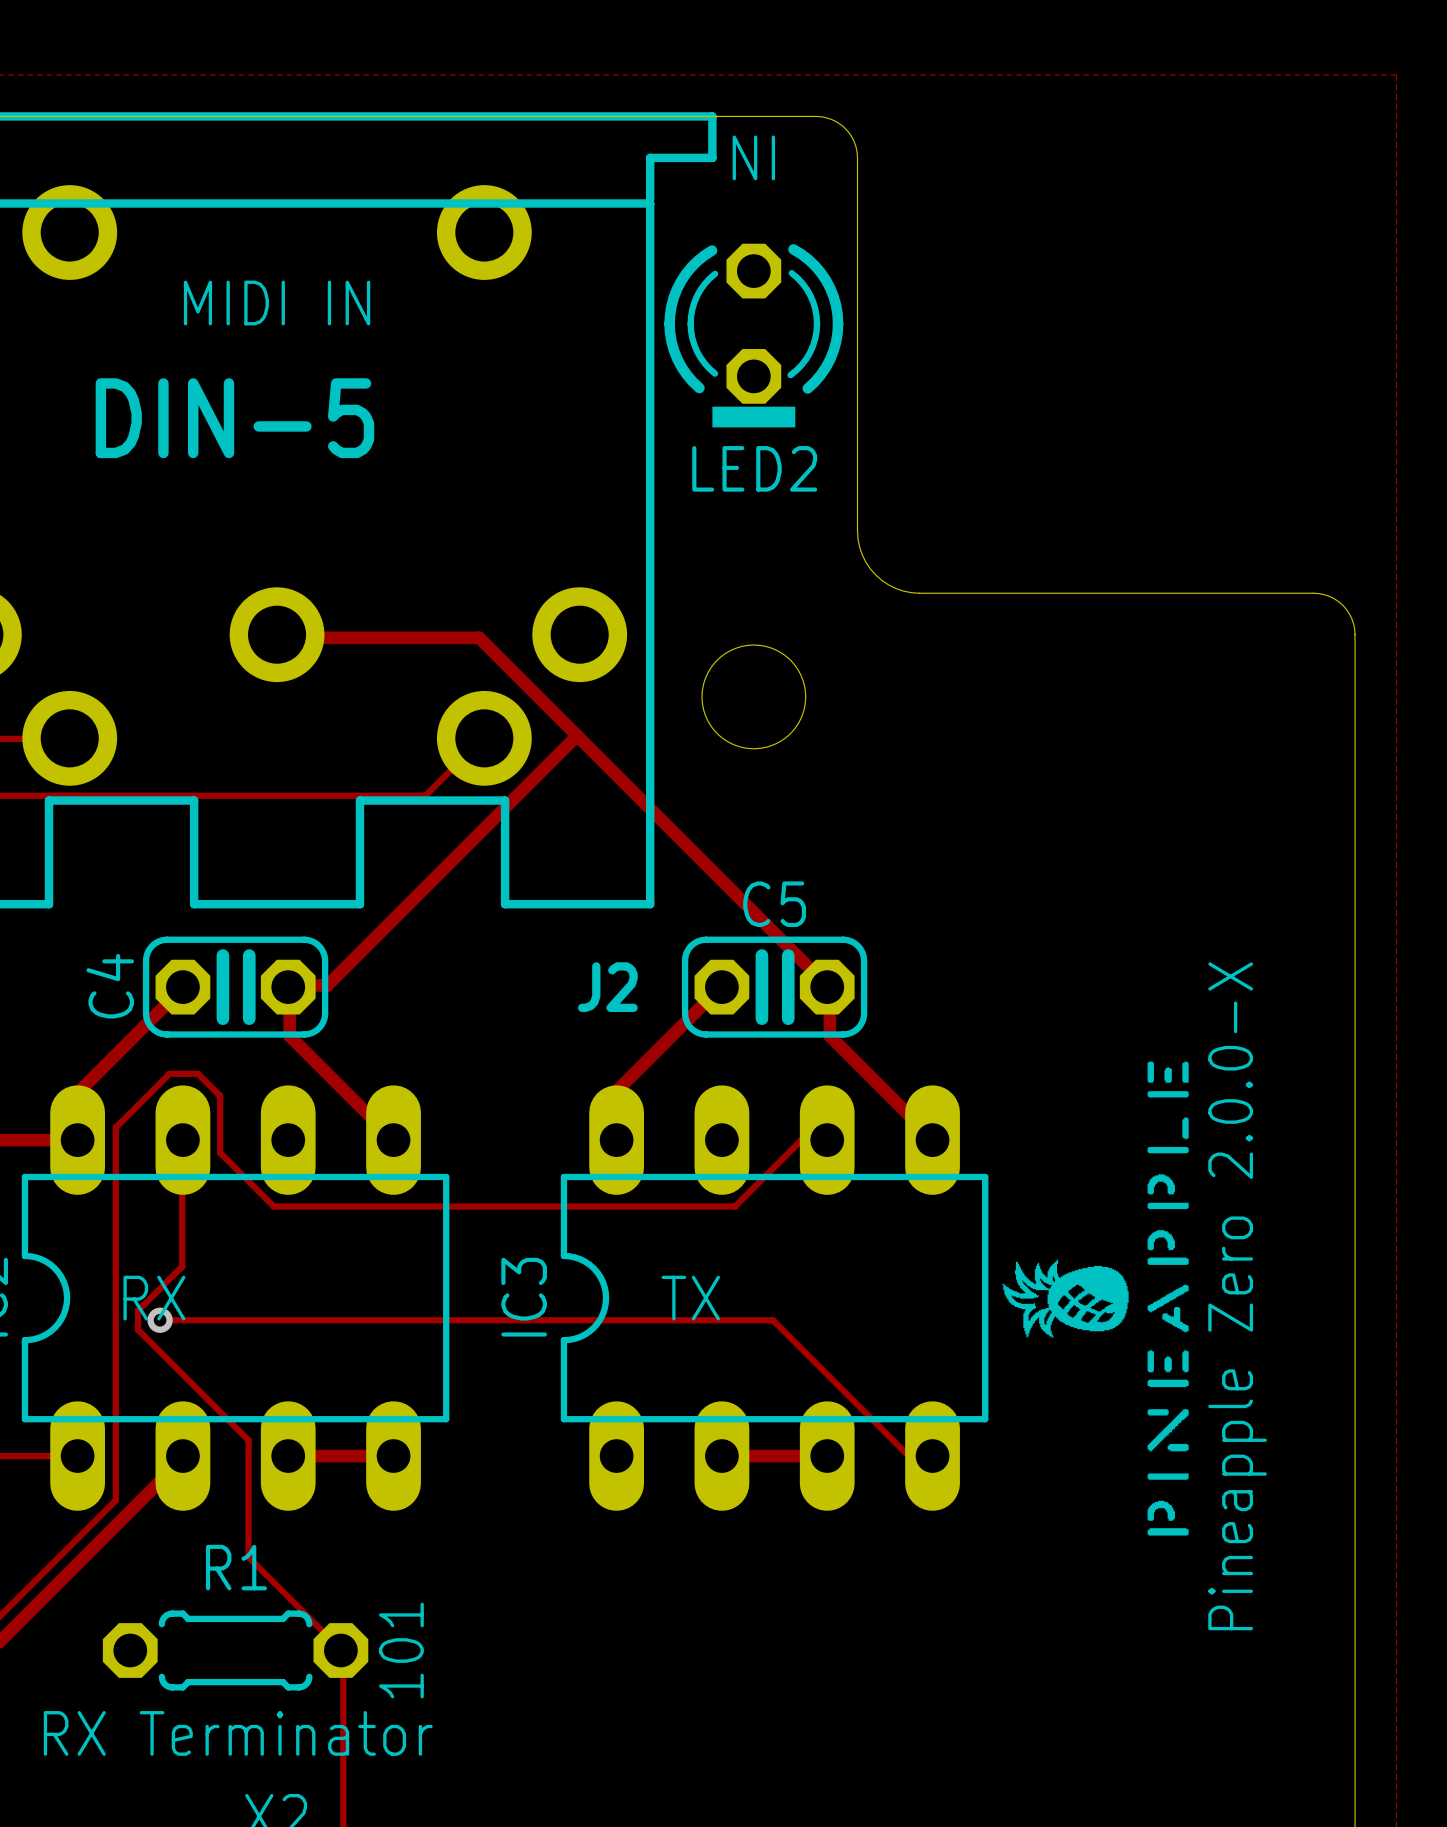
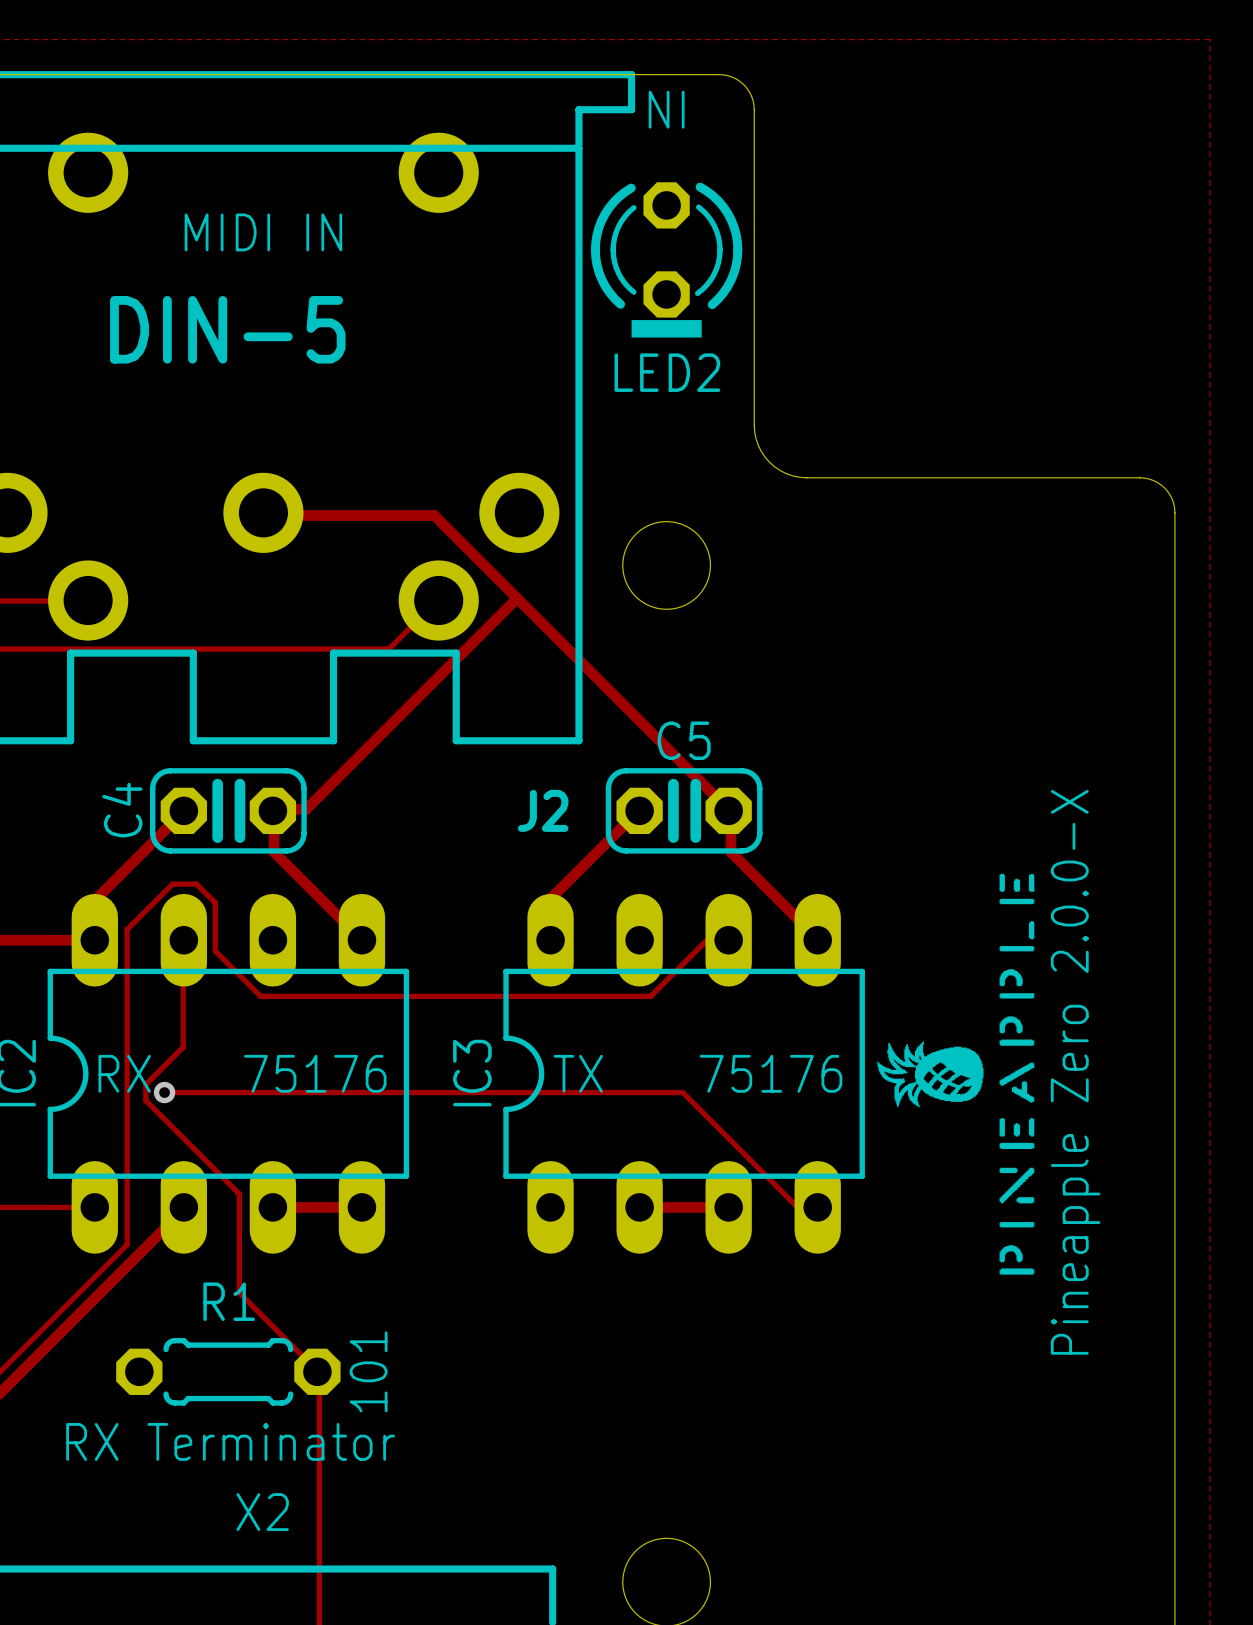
text position: RX (154, 1298) -> RX (124, 1073)
text: none -> 75176 (315, 1073)
text position: TX (690, 1298) -> TX (578, 1073)
text: none -> 75176 (771, 1073)

